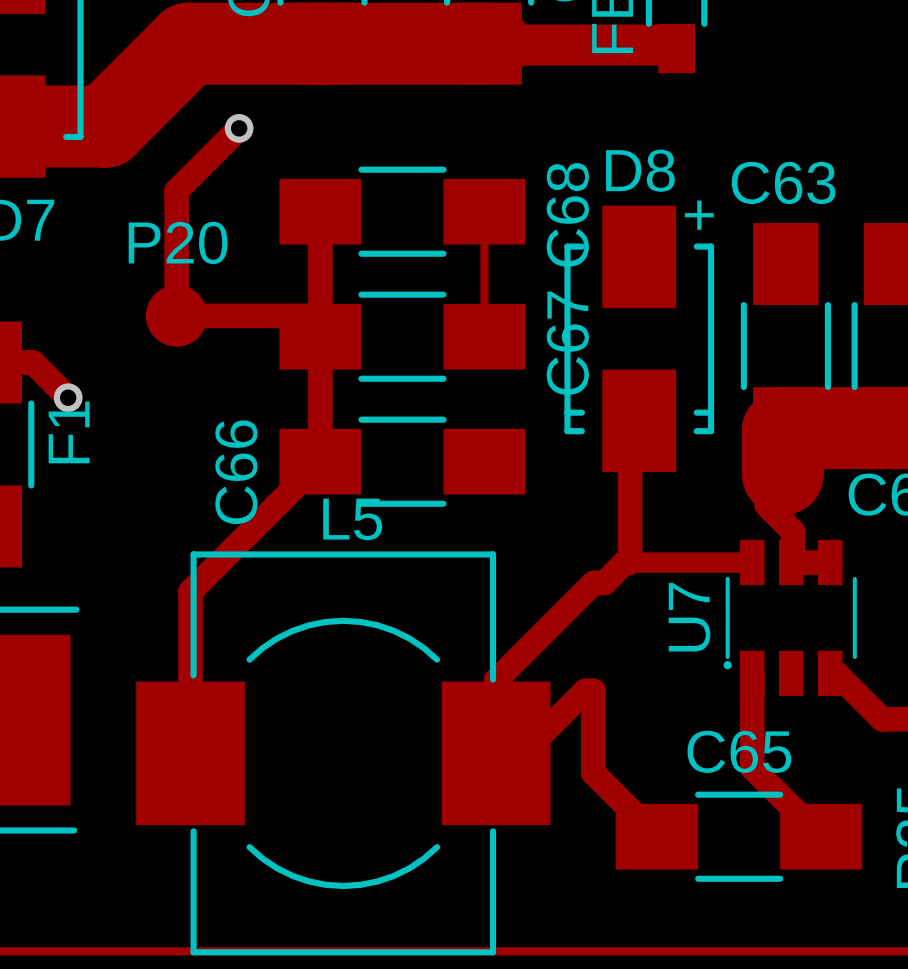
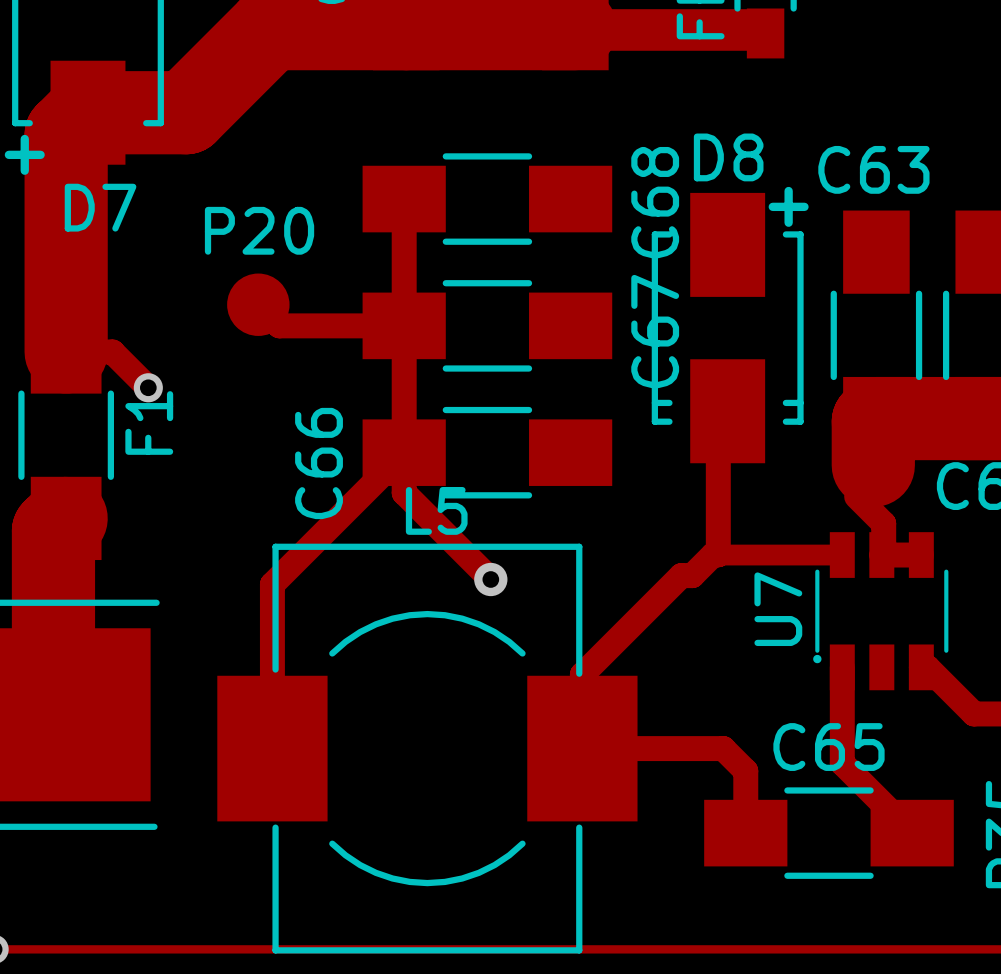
track: (239, 128) (176, 190) (176, 315) (320, 315) -> none
via: (239, 128) -> none
track: (484, 211) (484, 336) -> none
track: none -> (258, 304) (279, 325) (404, 325)
track: none -> (404, 452) (404, 492) (490, 579)
via: none -> (490, 579)
track: (522, 753) (585, 690) (593, 690) (593, 772) (657, 836) -> (609, 748) (723, 748) (745, 771) (745, 833)

